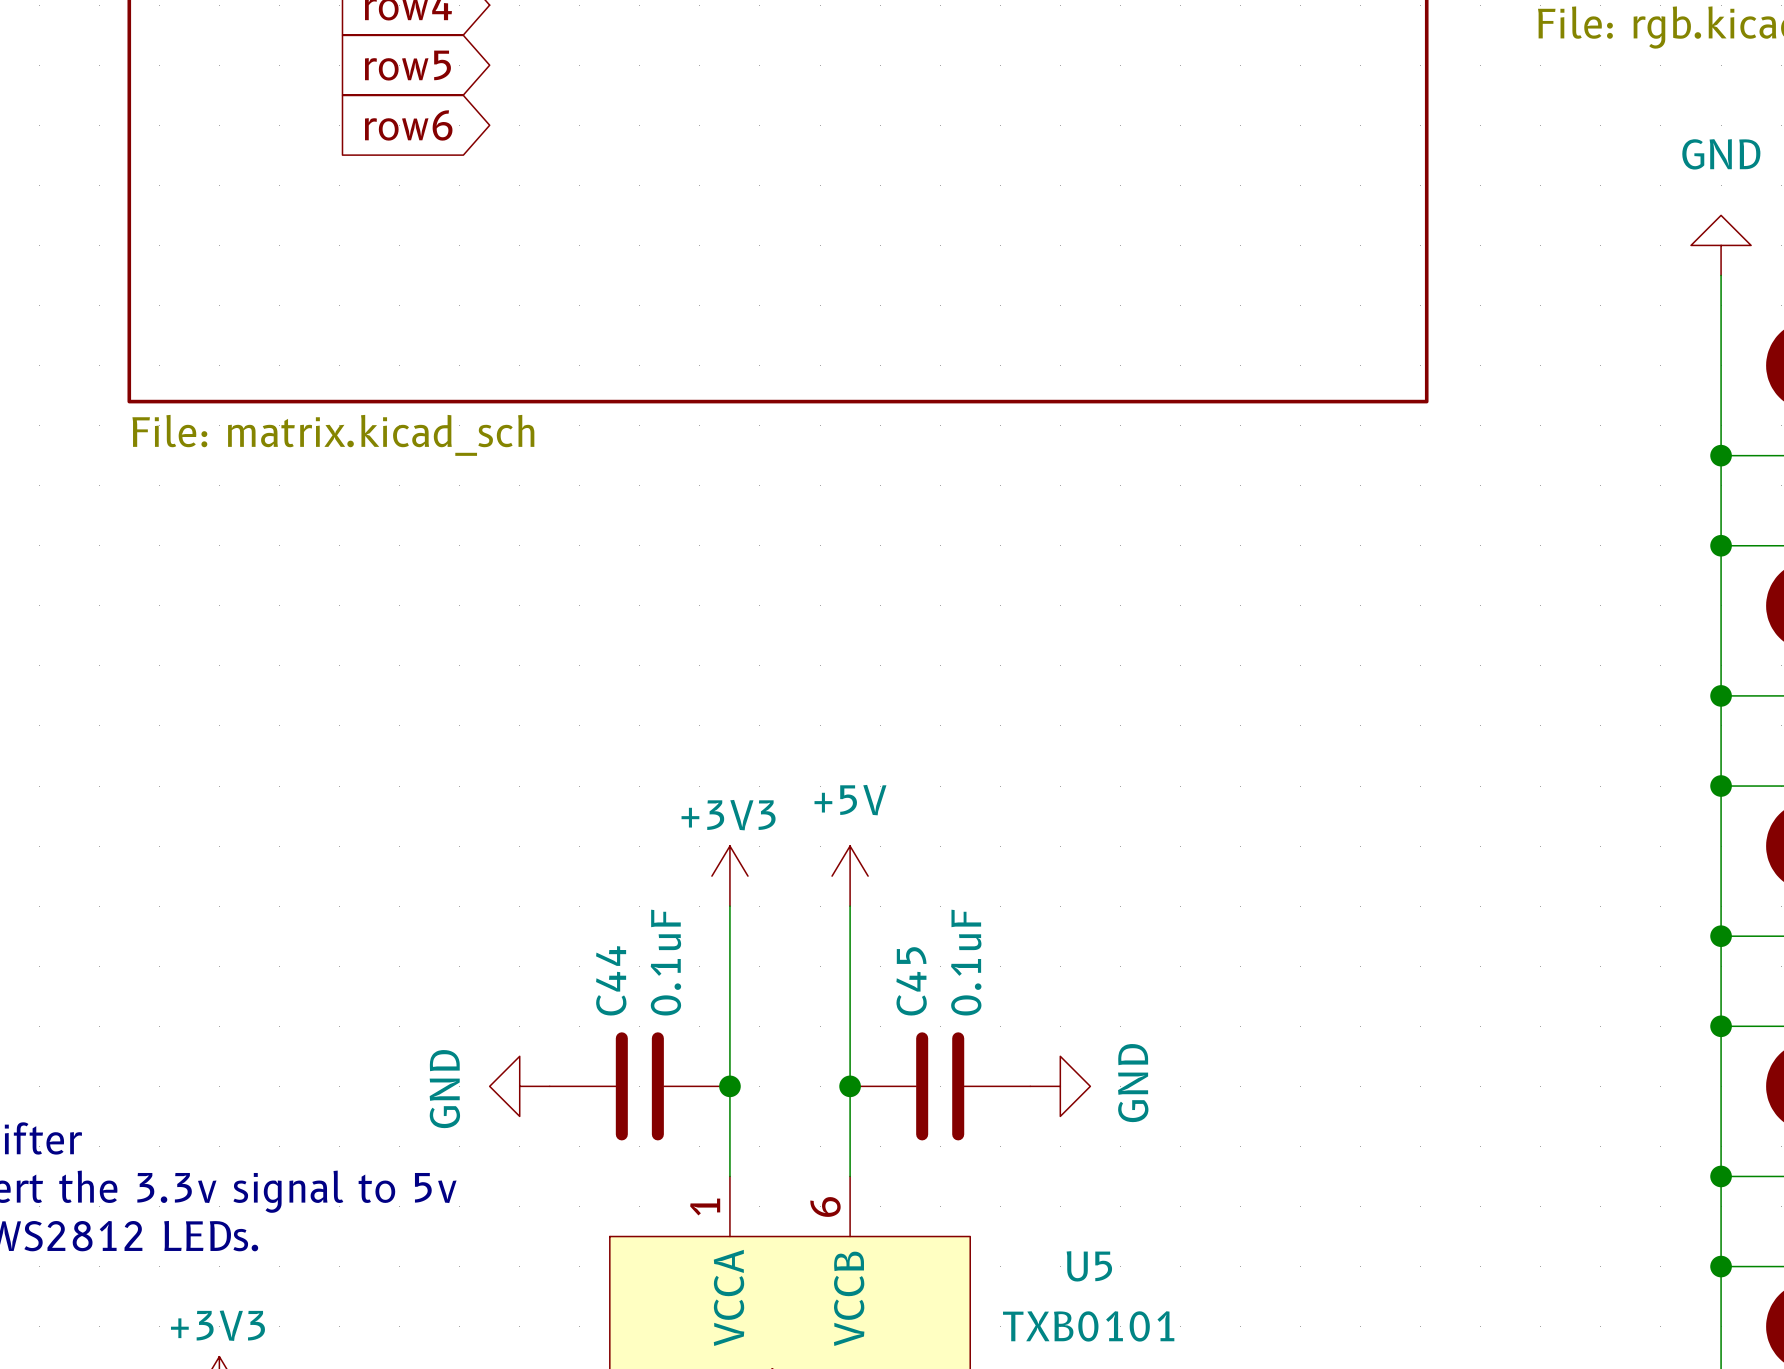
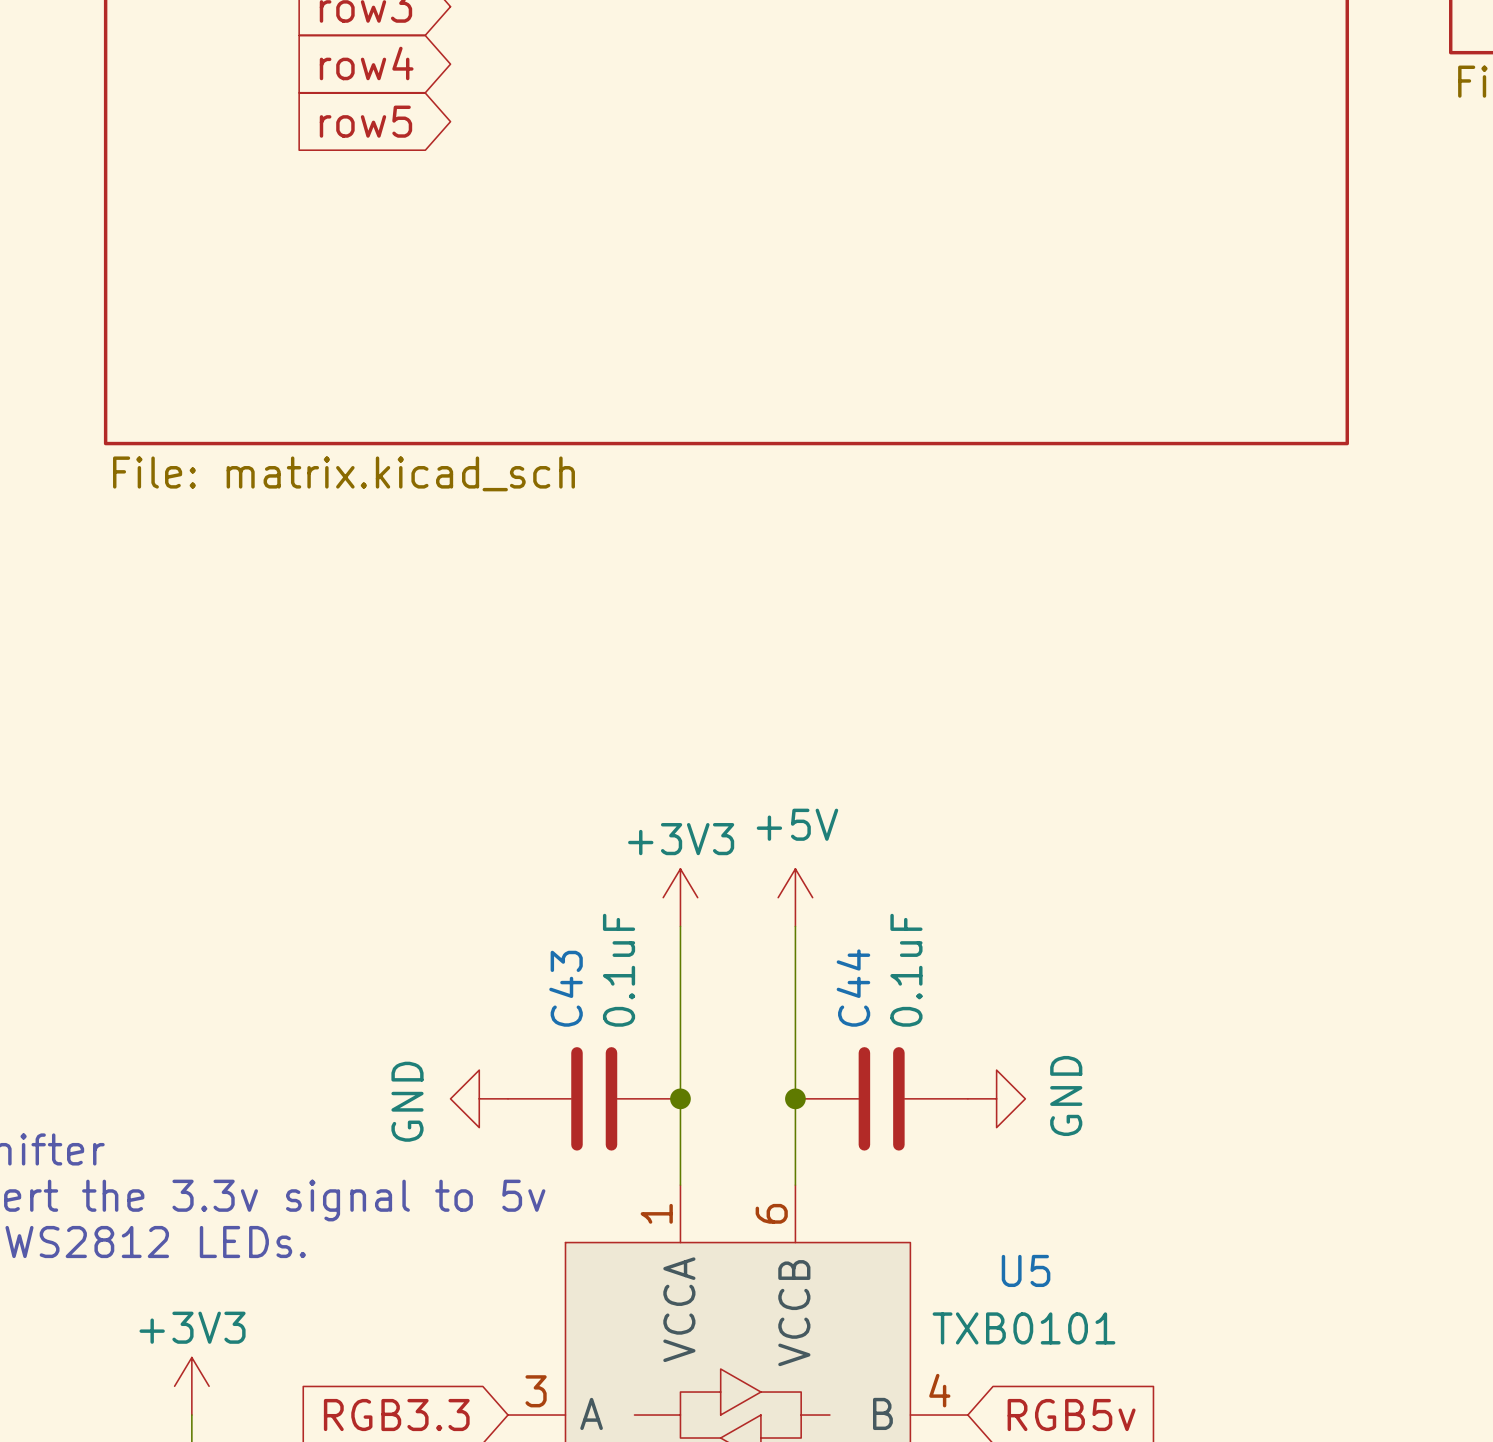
global label: row6 (408, 125) -> none
C44 name: C44 (611, 980) -> C43 (566, 988)
C45 name: C45 (911, 981) -> C44 (853, 988)

